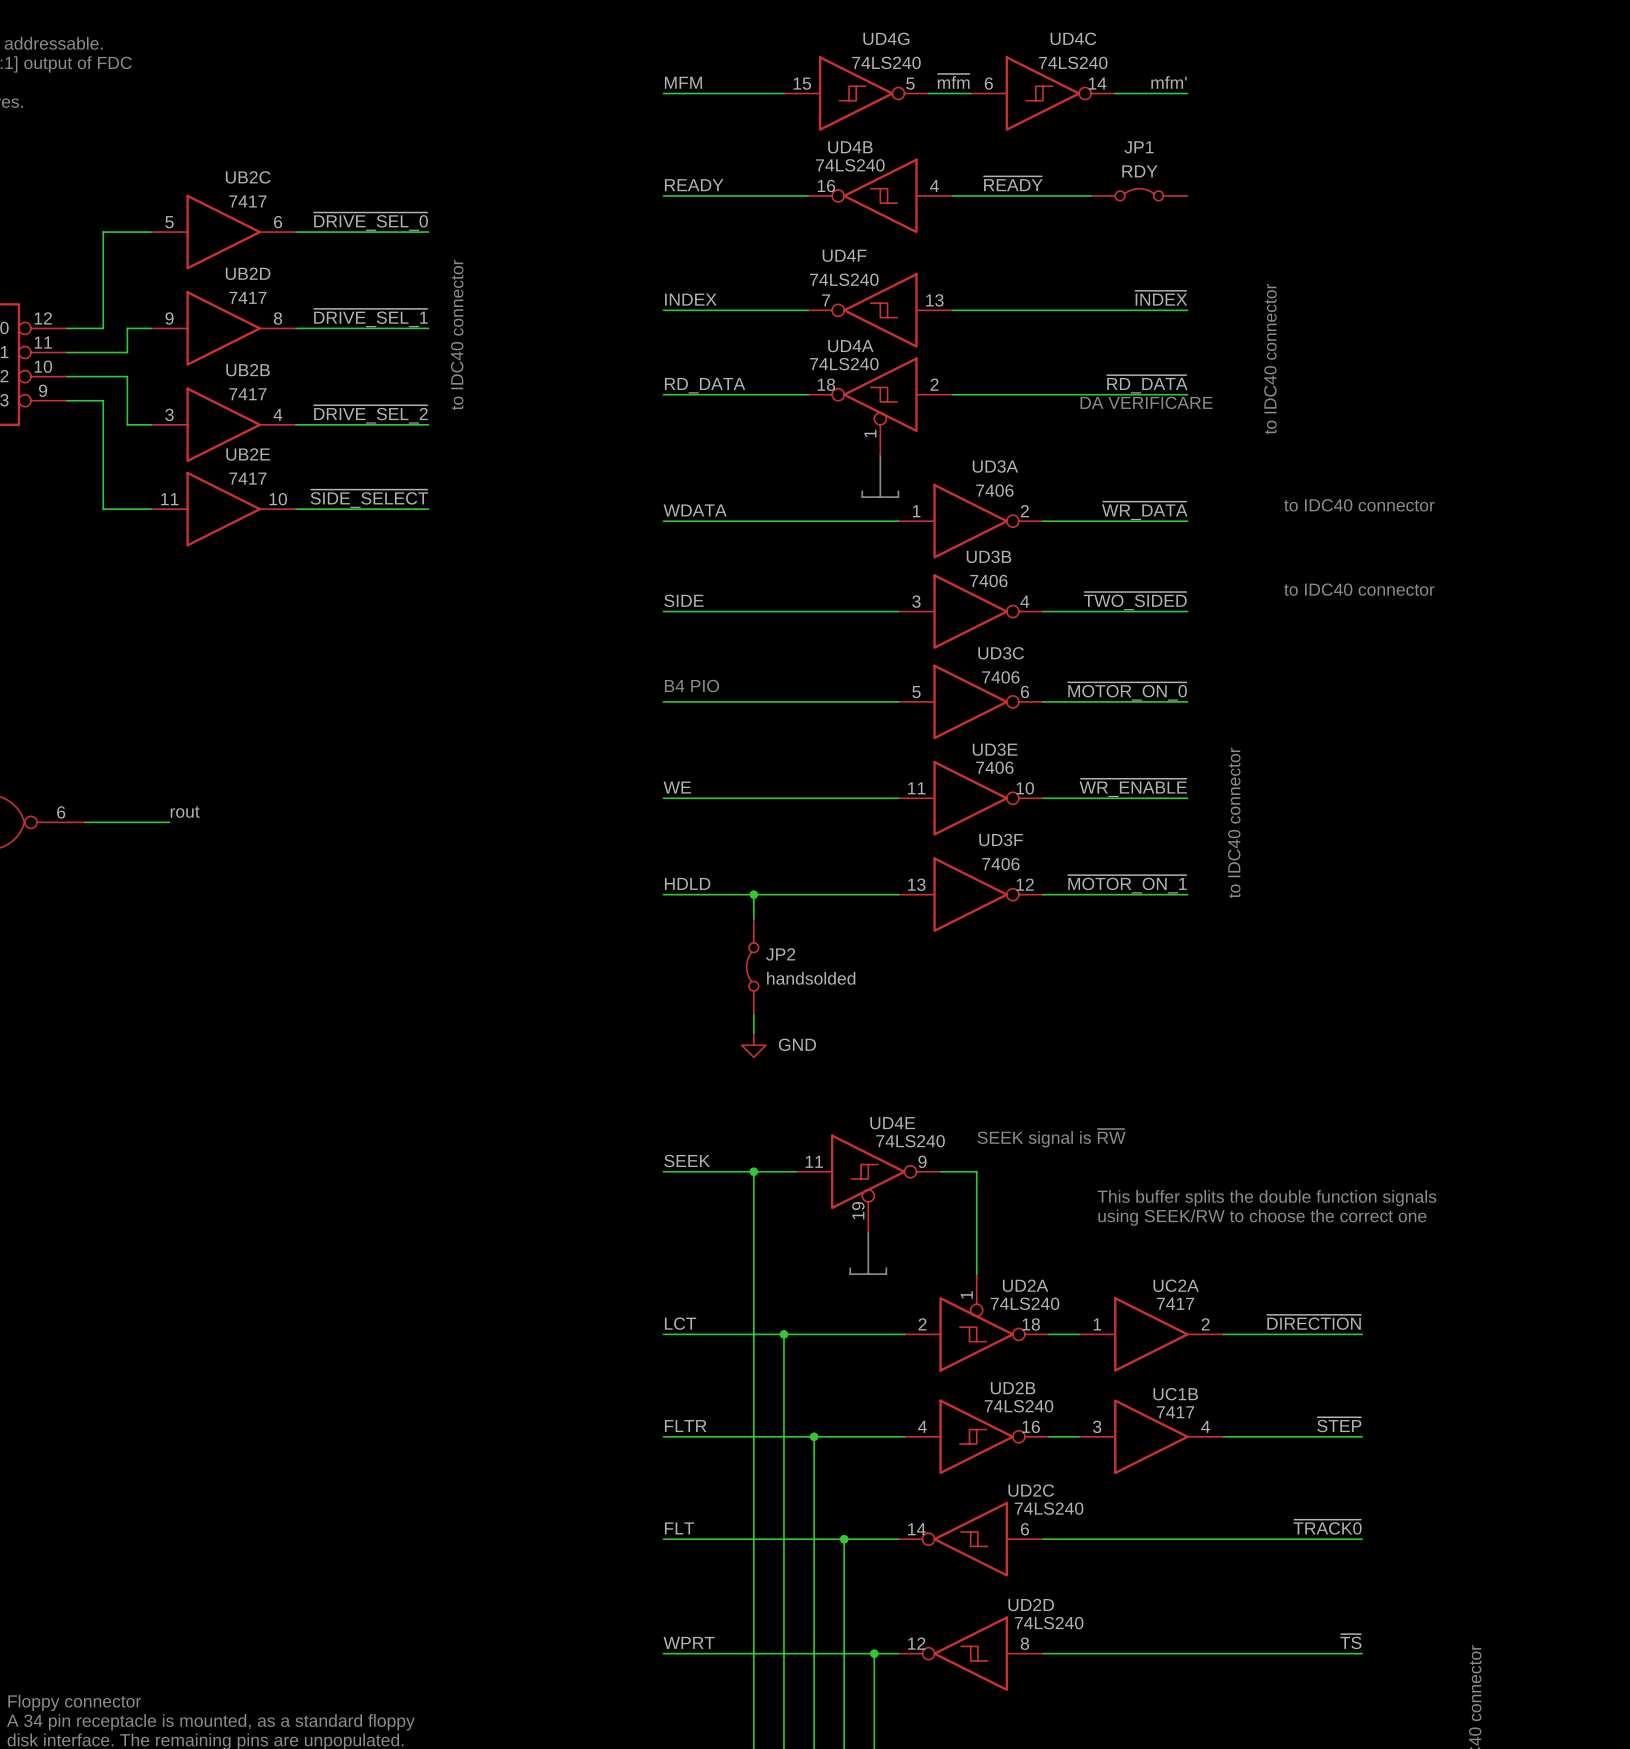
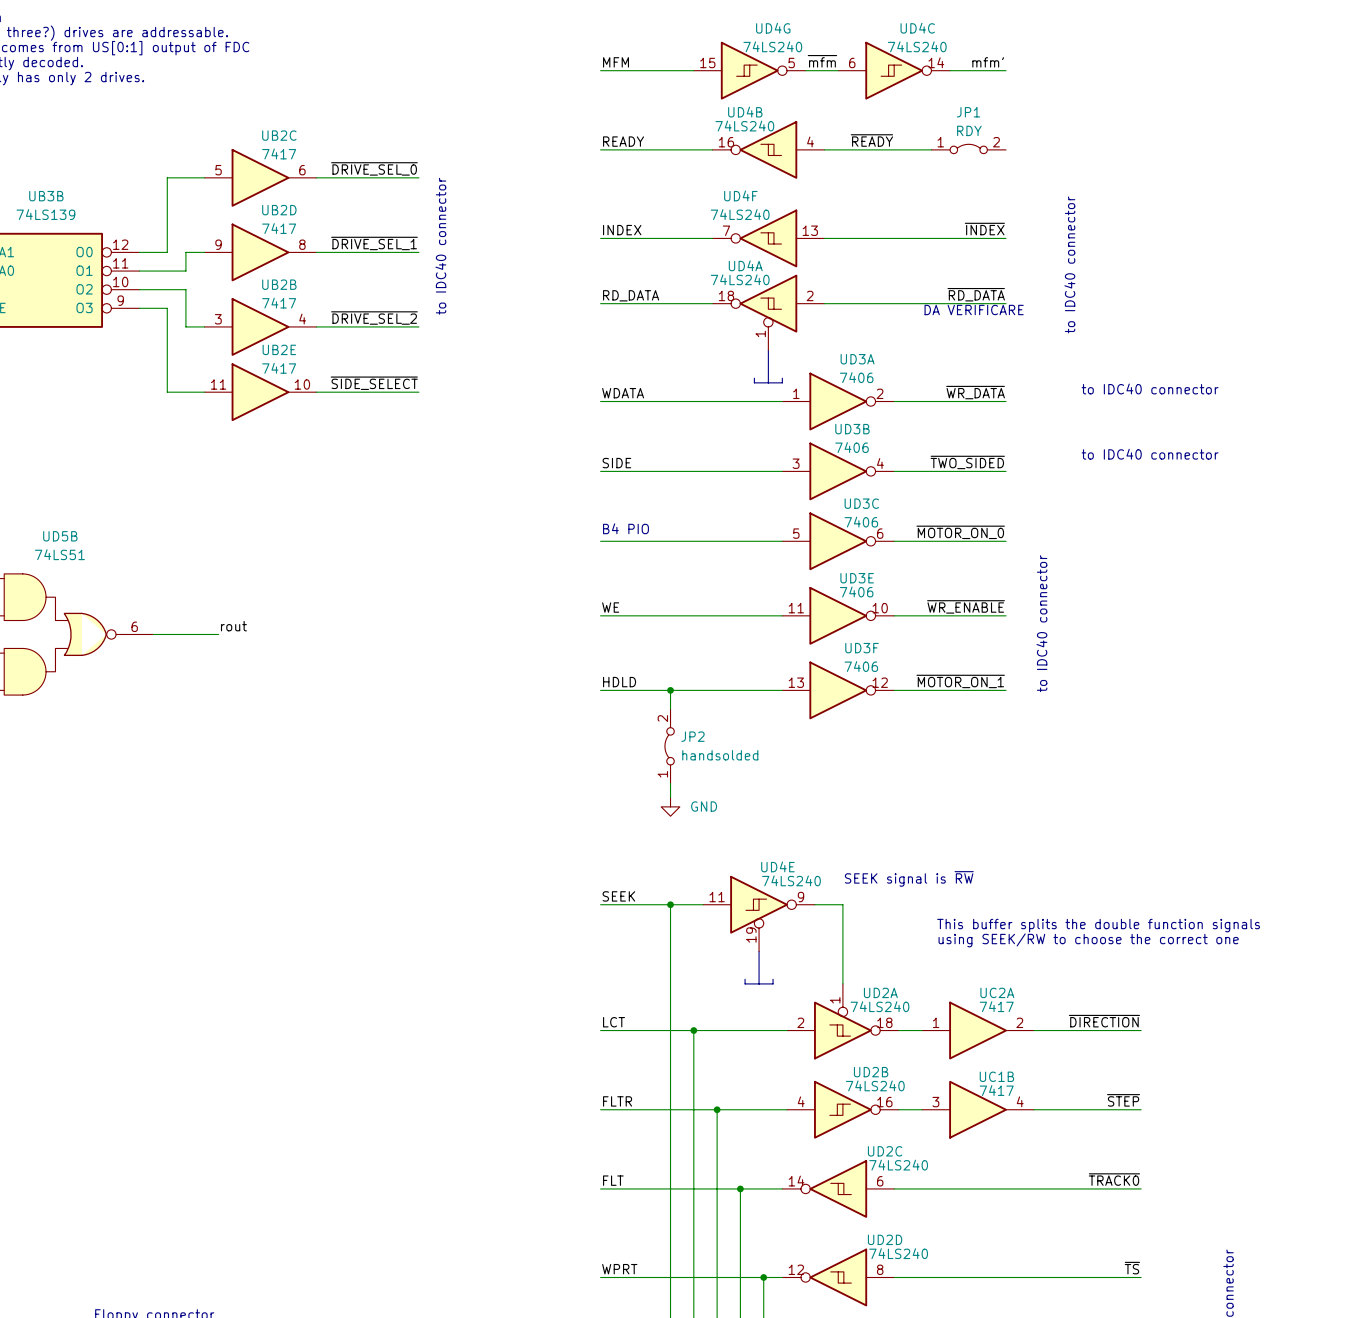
JP1 pin number: none -> 1 (940, 142)
JP1 pin number: none -> 2 (996, 142)
JP2 pin number: none -> 2 (662, 718)
JP2 pin number: none -> 1 (662, 774)

